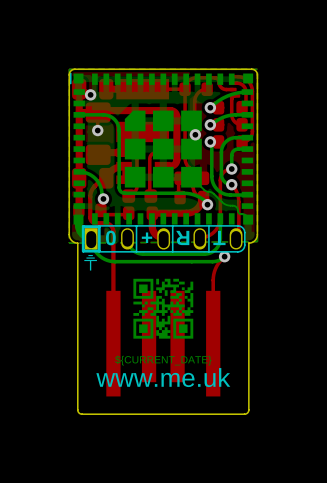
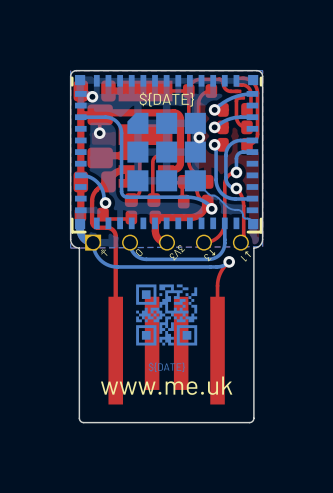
part footprint: [69, 72, 254, 225] -> [70, 75, 263, 234]
part footprint: [81, 225, 246, 253] -> [85, 234, 249, 251]
part footprint: [133, 278, 194, 339] -> [136, 284, 198, 346]

